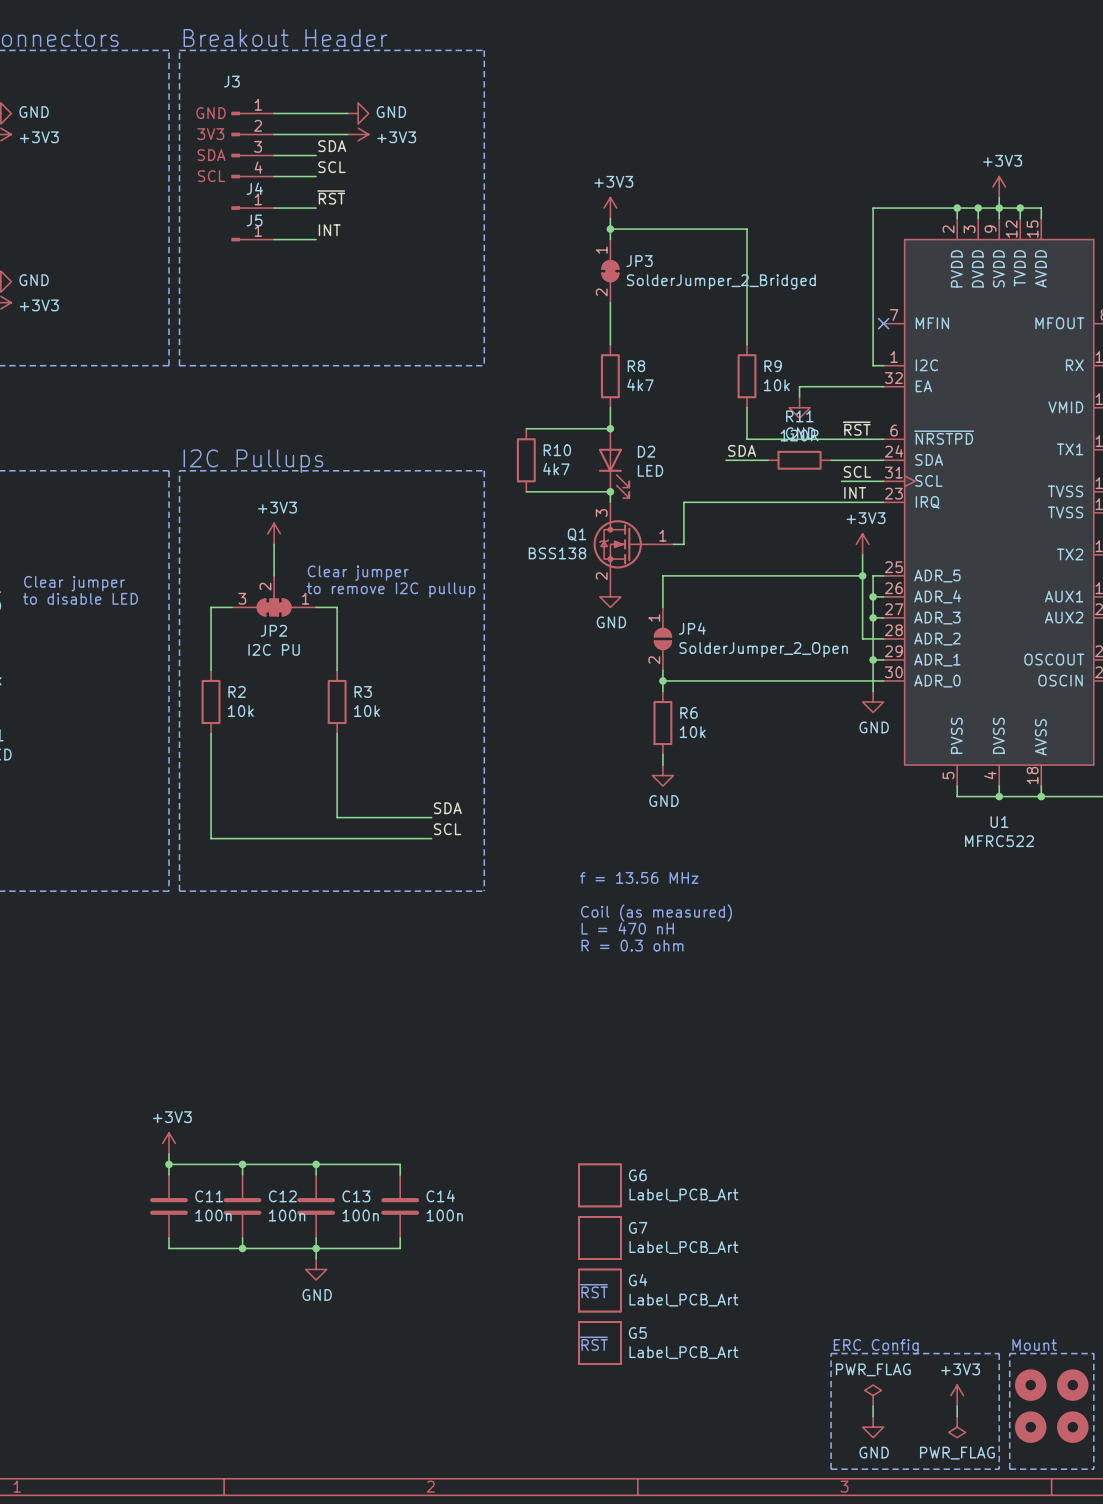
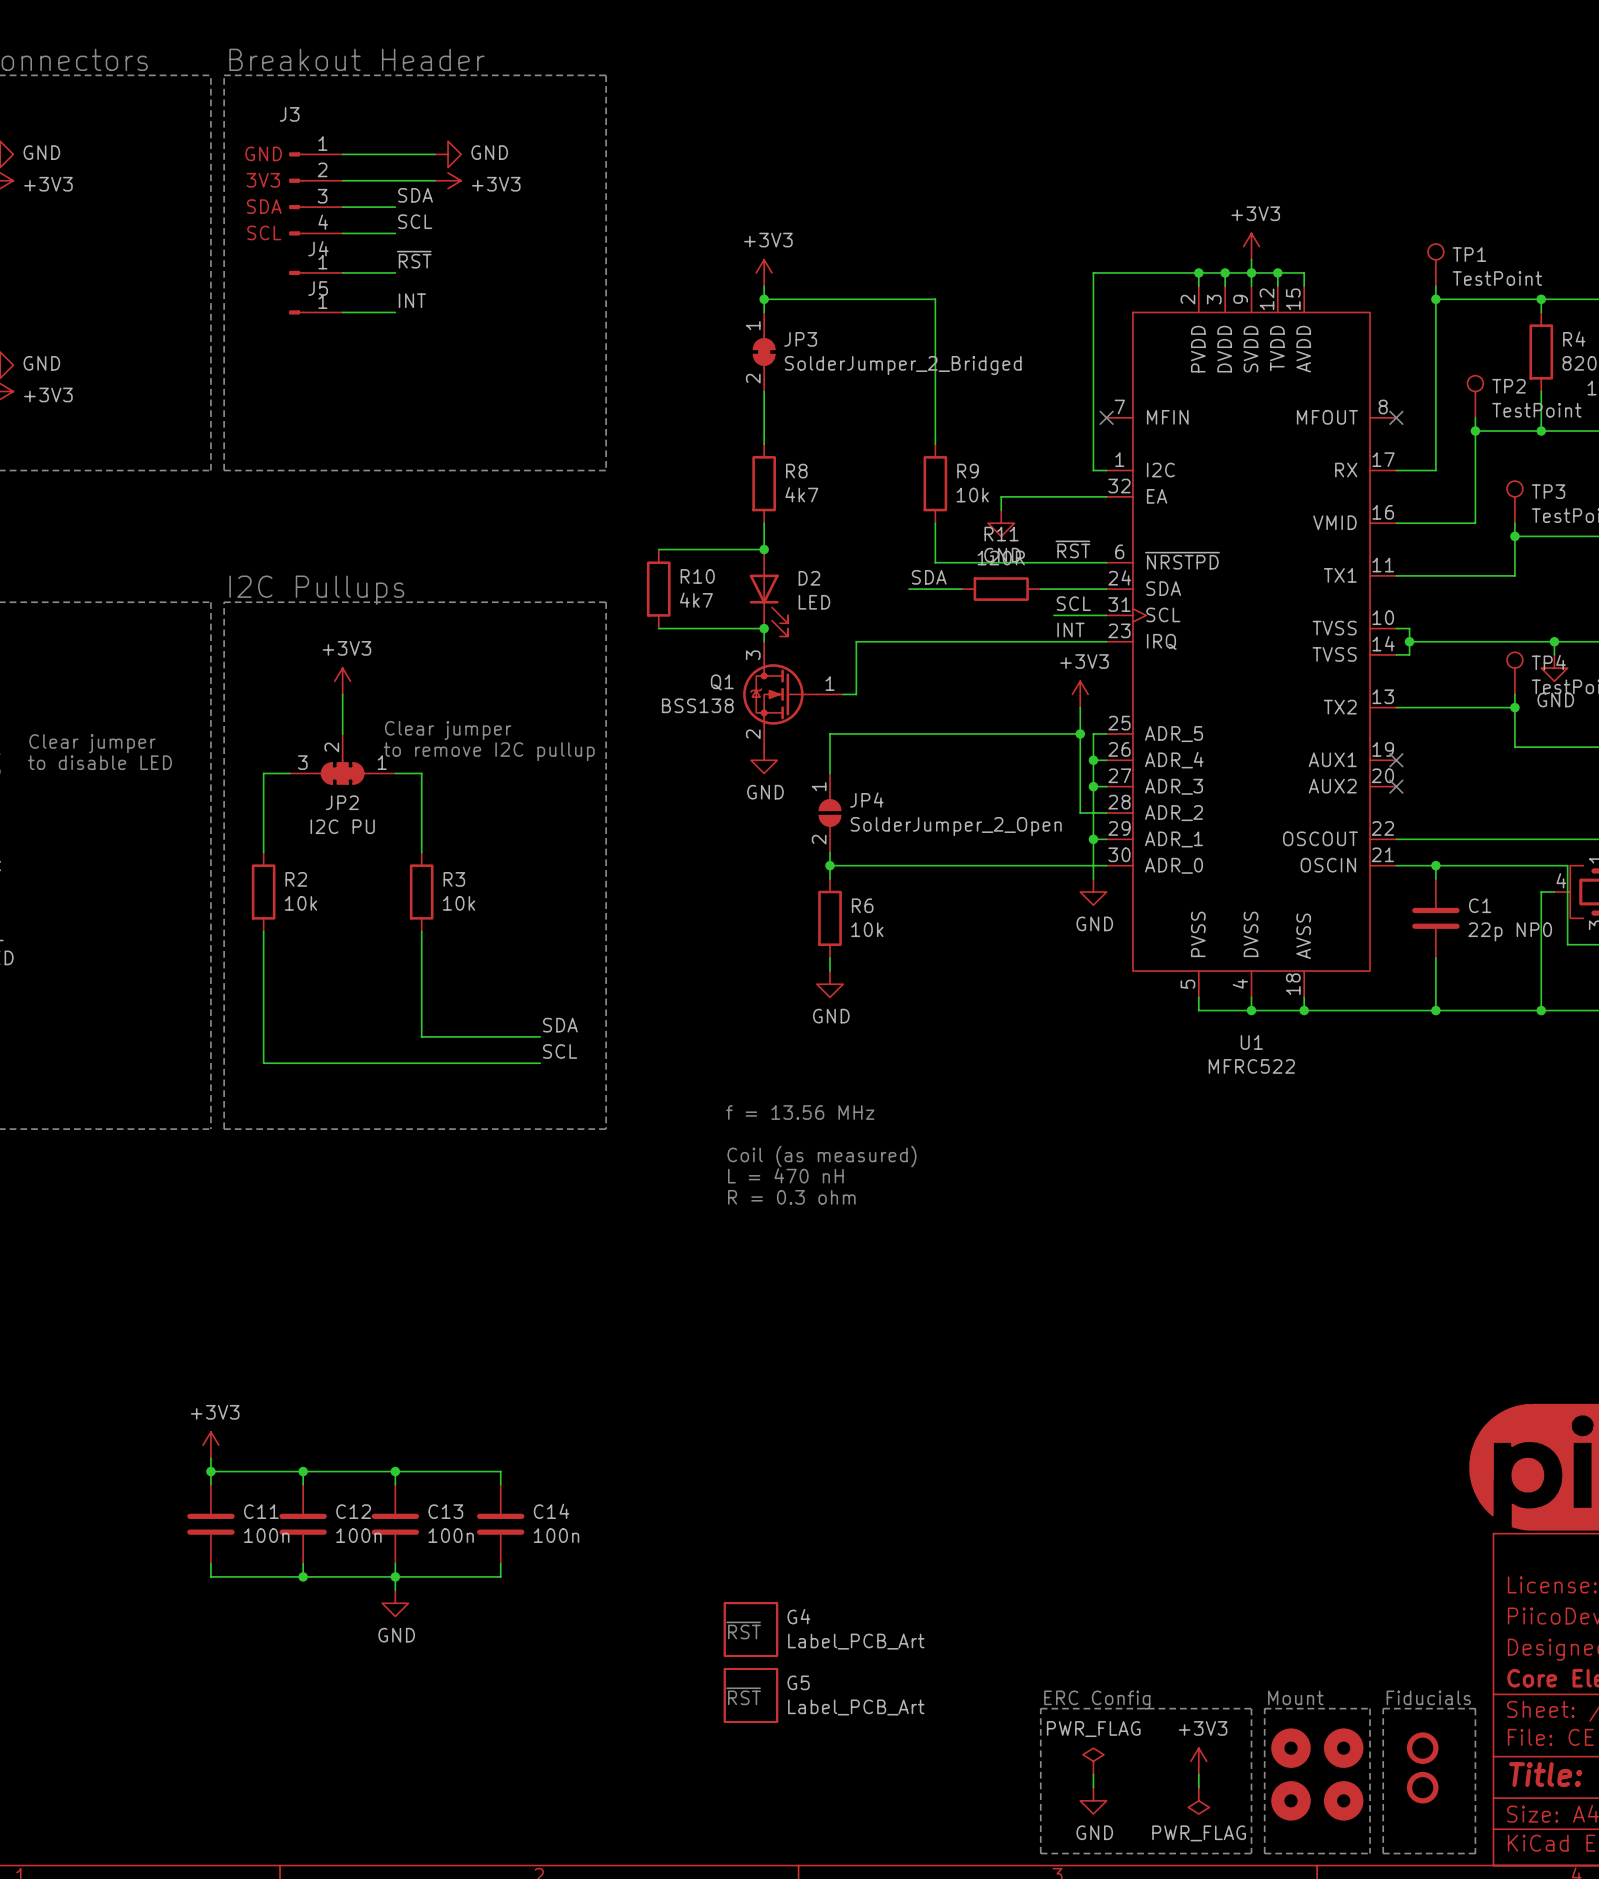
G6: Label_PCB_Art (599, 1185) -> none
G7: Label_PCB_Art (599, 1237) -> none

